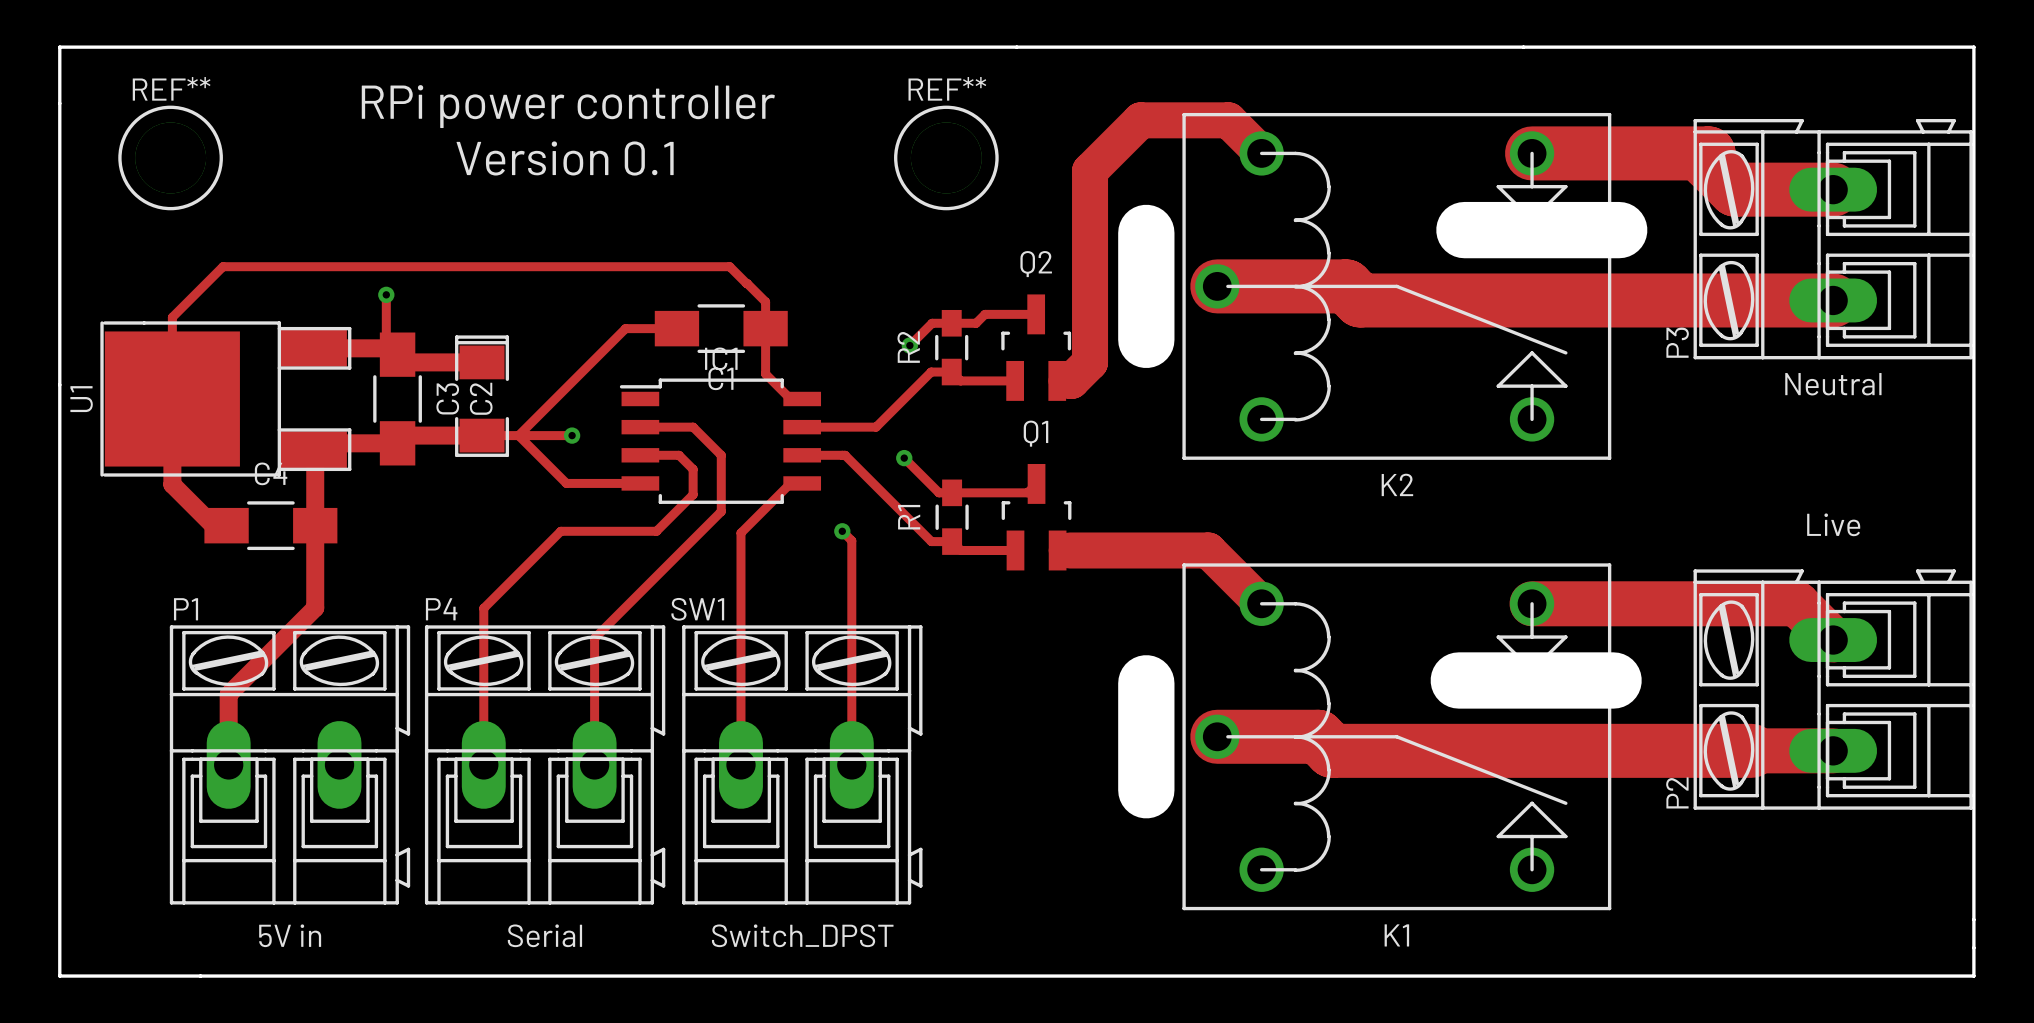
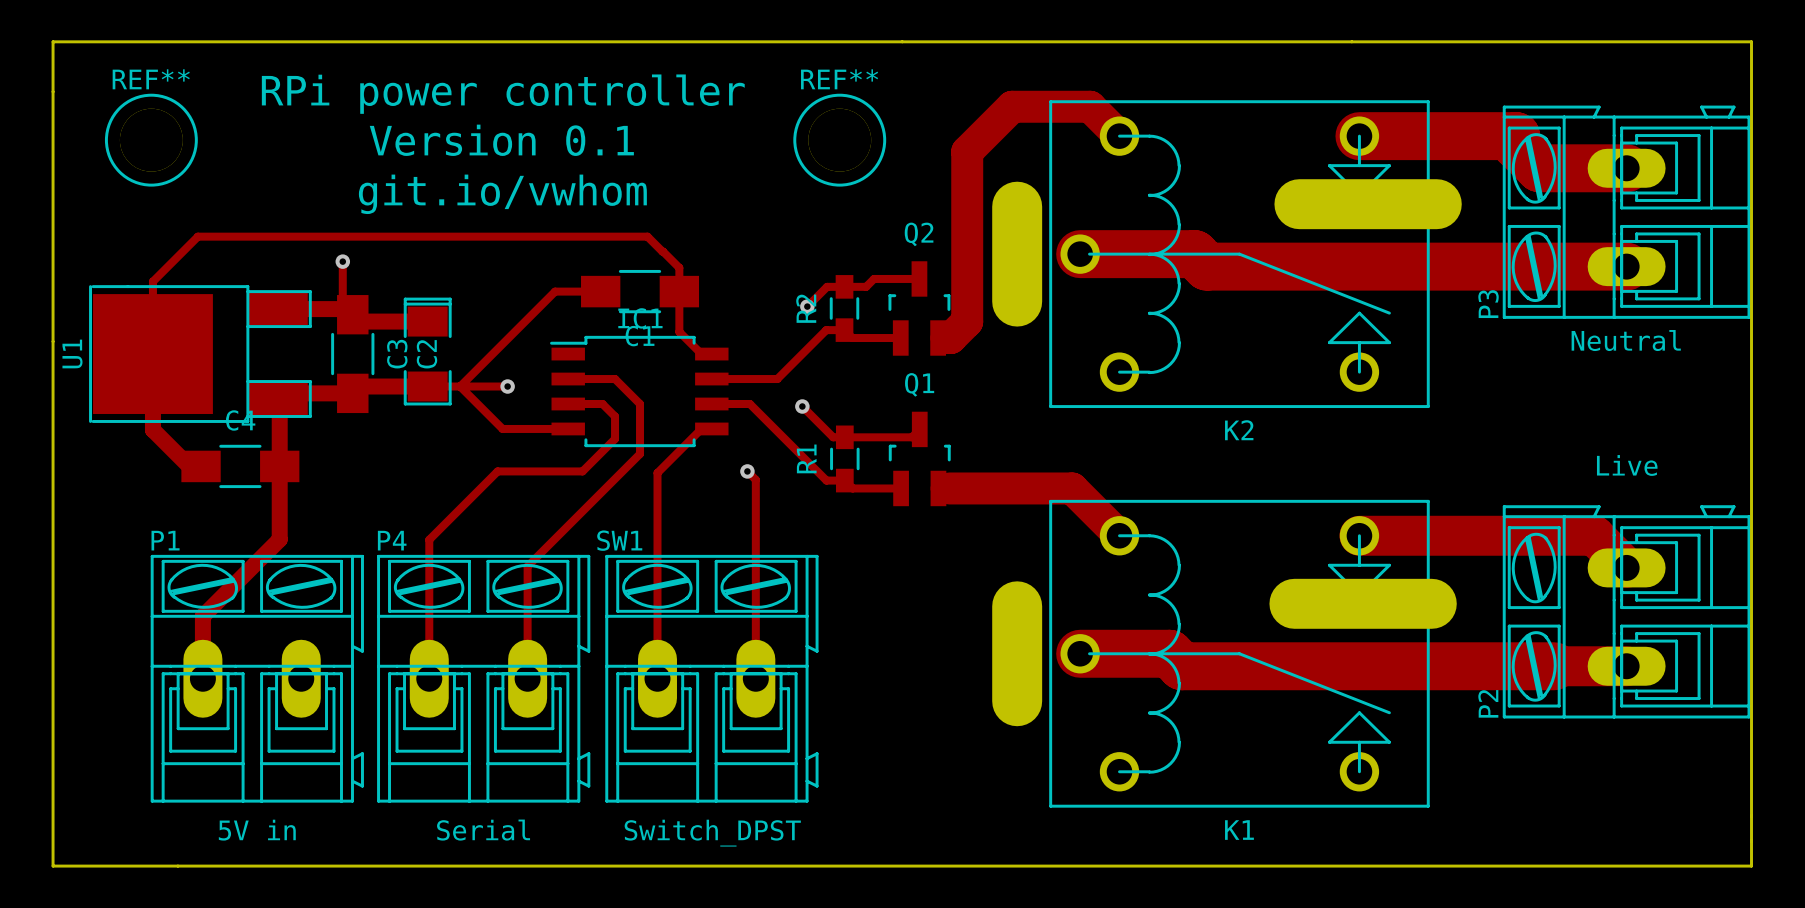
text: none -> git.io/vwhom (502, 194)

